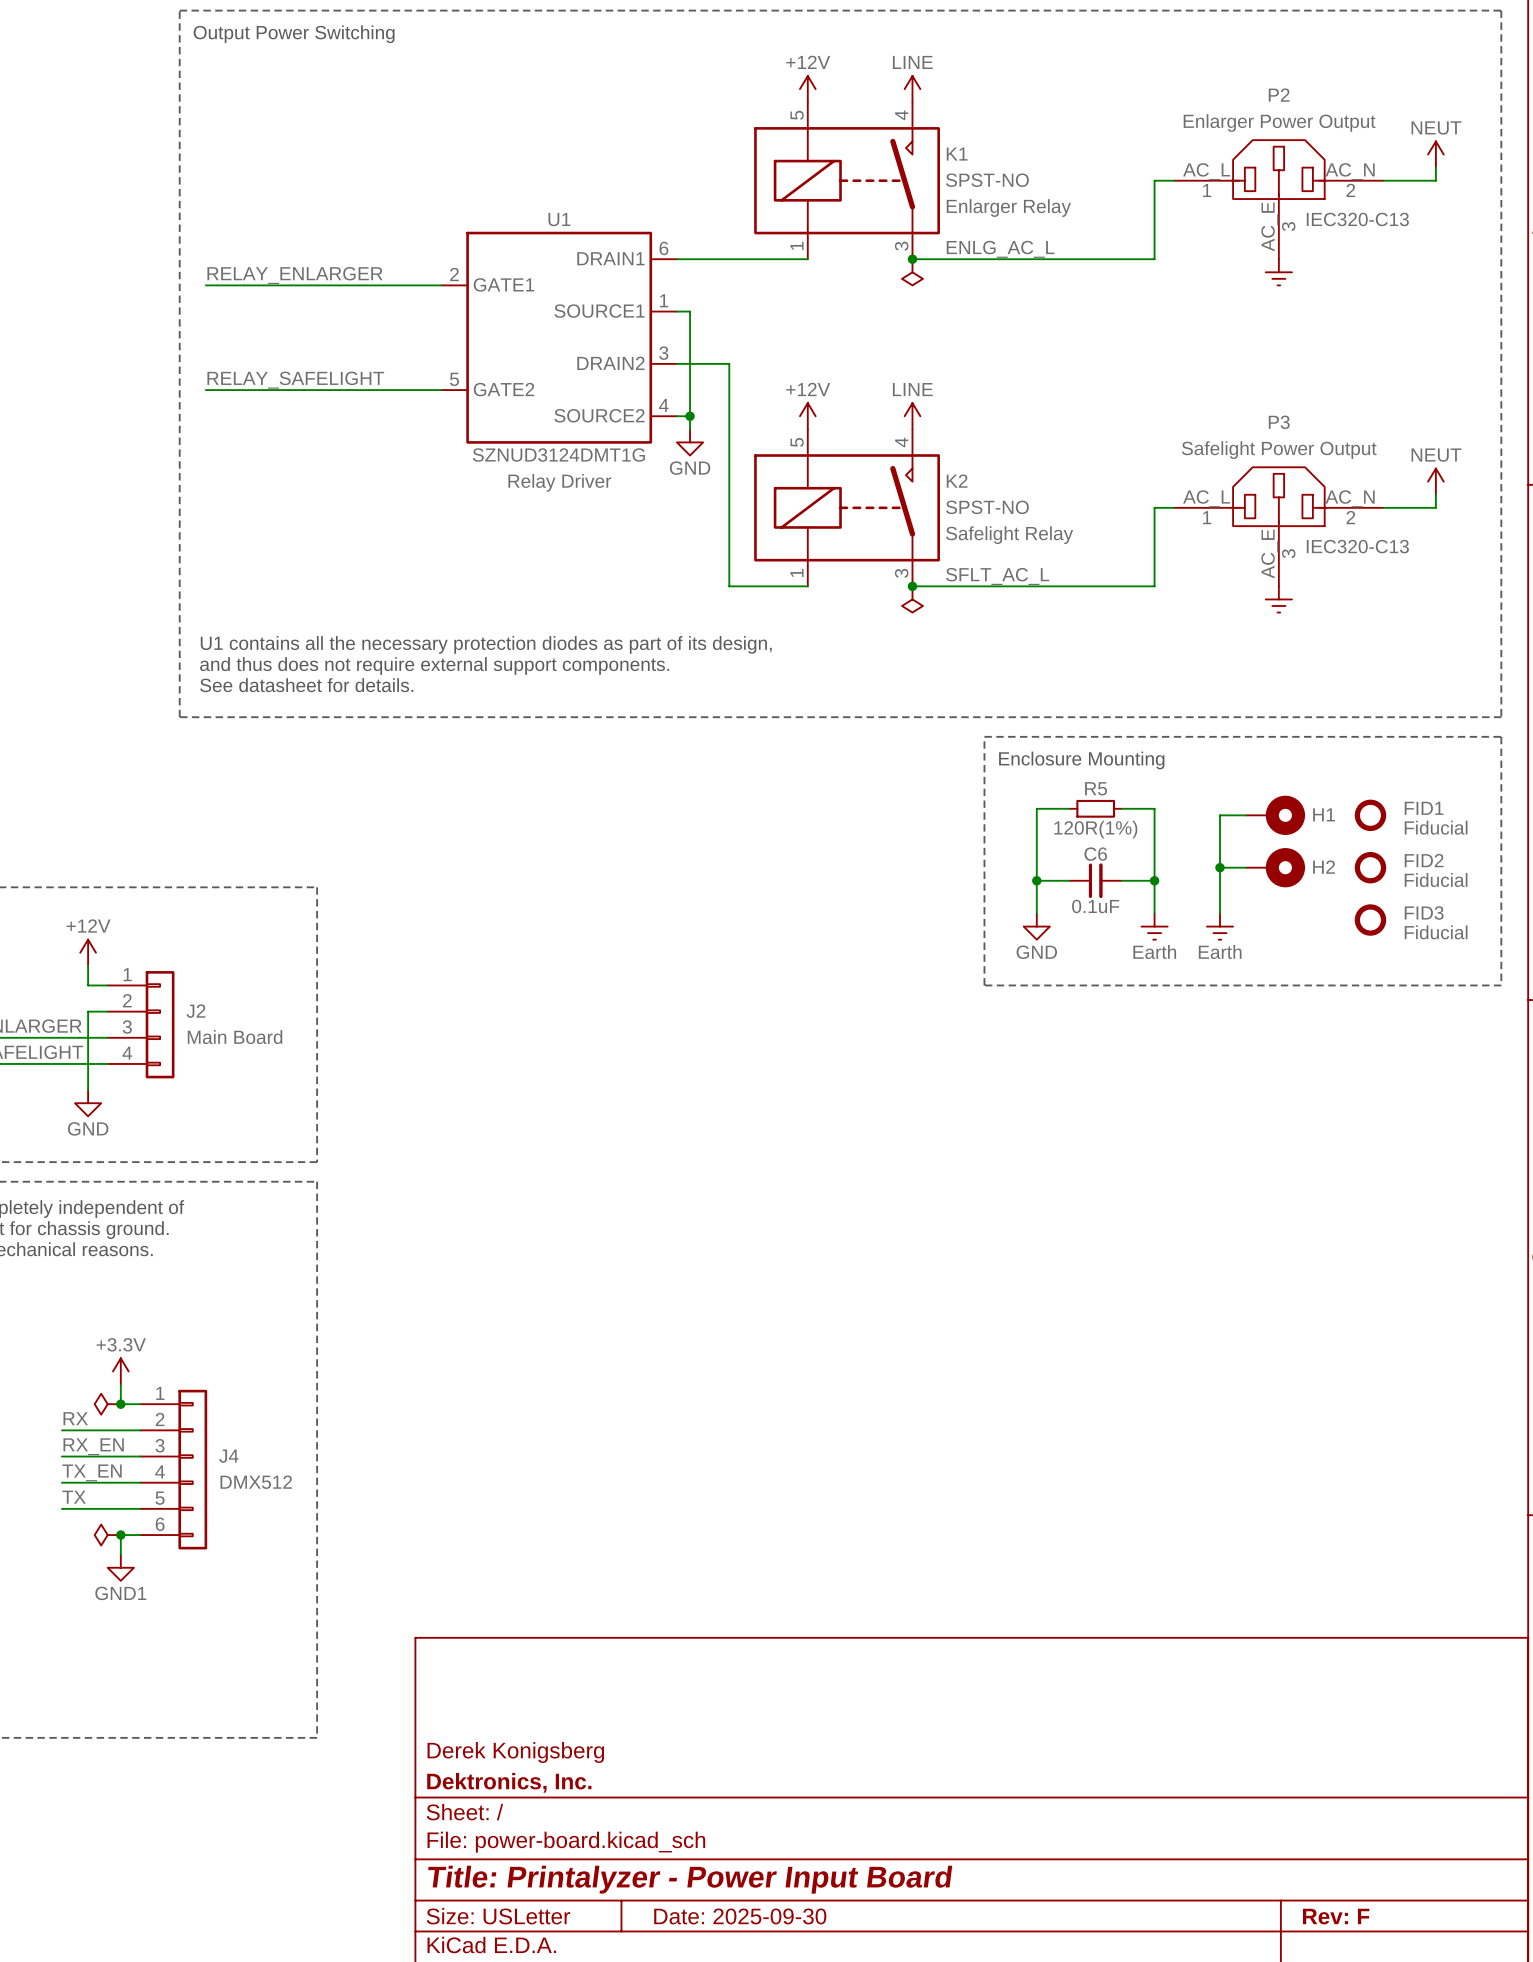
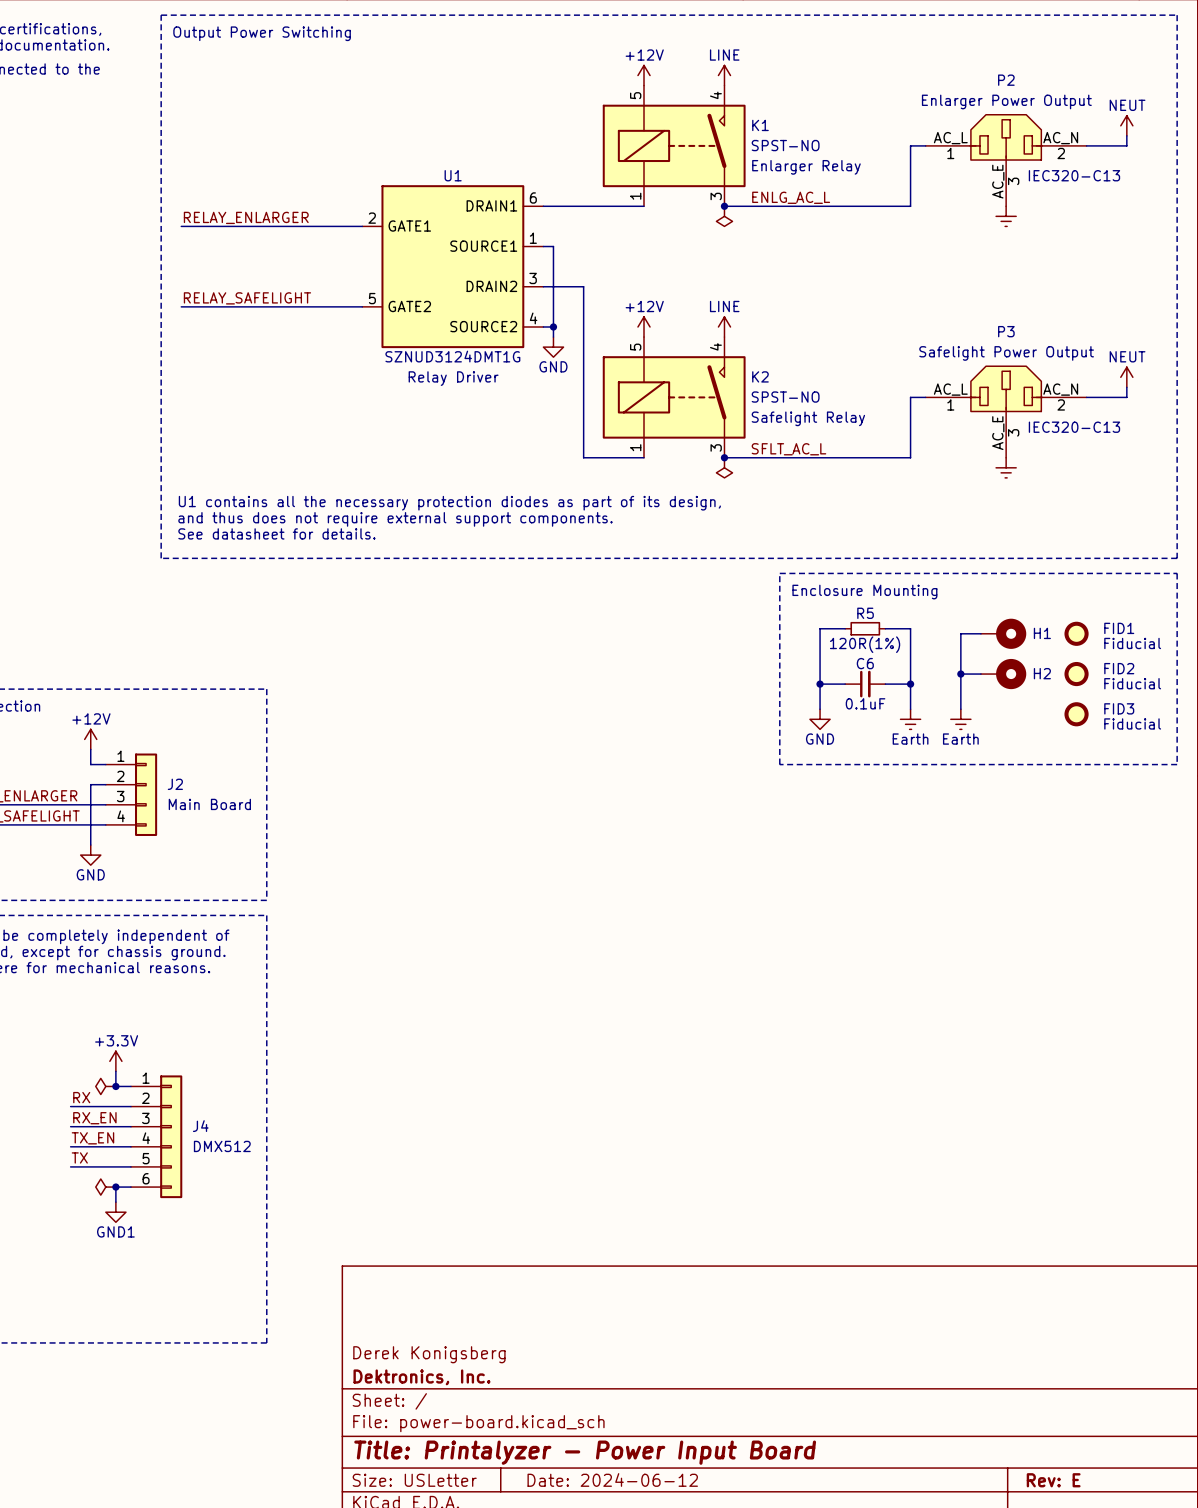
title block: Date: 2025-09-30 (740, 1916) -> Date: 2024-06-12 (612, 1479)
title block: Rev: F (1336, 1916) -> Rev: E (1053, 1480)

